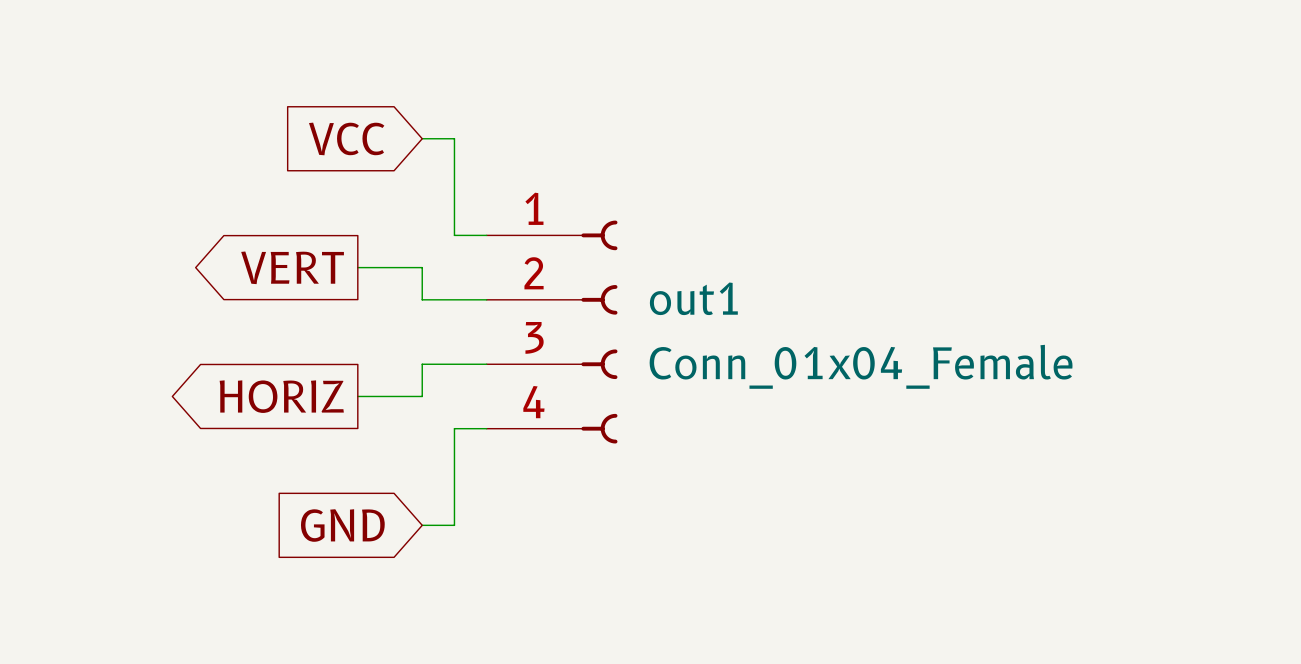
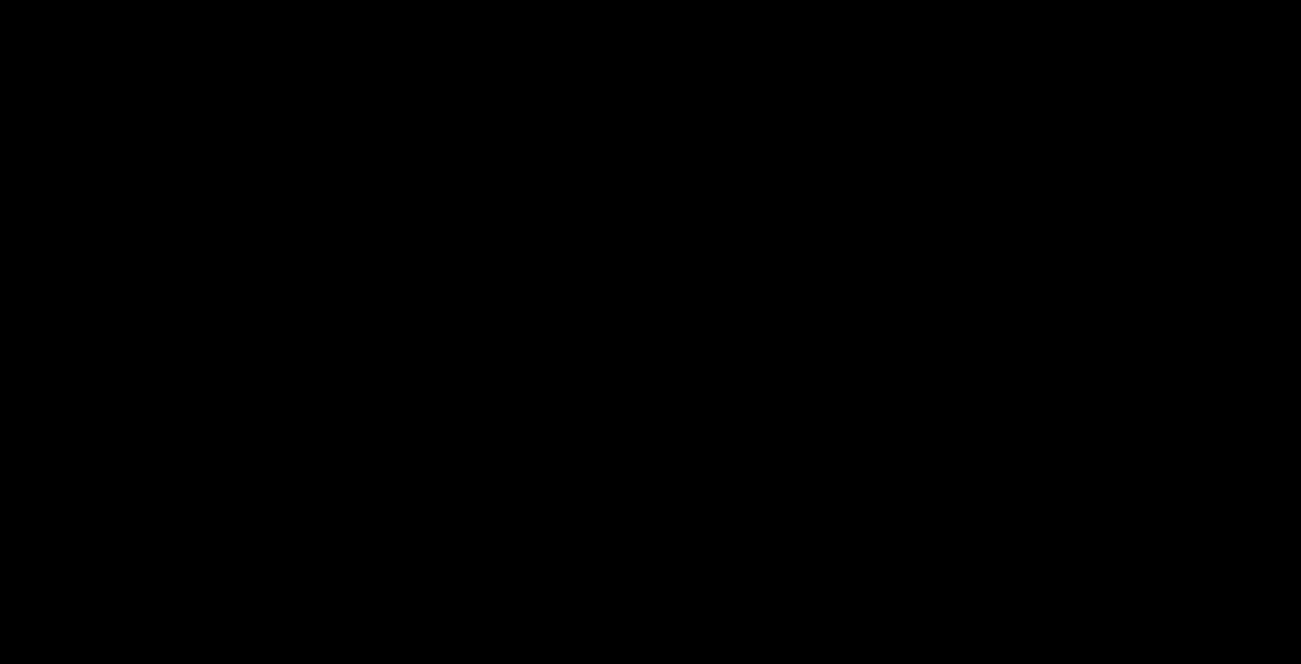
global label: VCC (346, 138) -> none
wire: (422, 138) (454, 138) (454, 235) (486, 235) -> none
global label: VERT (292, 267) -> none
wire: (357, 267) (422, 267) (422, 299) (486, 299) -> none
out1: Conn_01x04_Female (552, 332) -> none
wire: (486, 364) (422, 364) (422, 396) (357, 396) -> none
global label: HORIZ (281, 396) -> none
wire: (486, 428) (454, 428) (454, 525) (422, 525) -> none
global label: GND (342, 525) -> none

